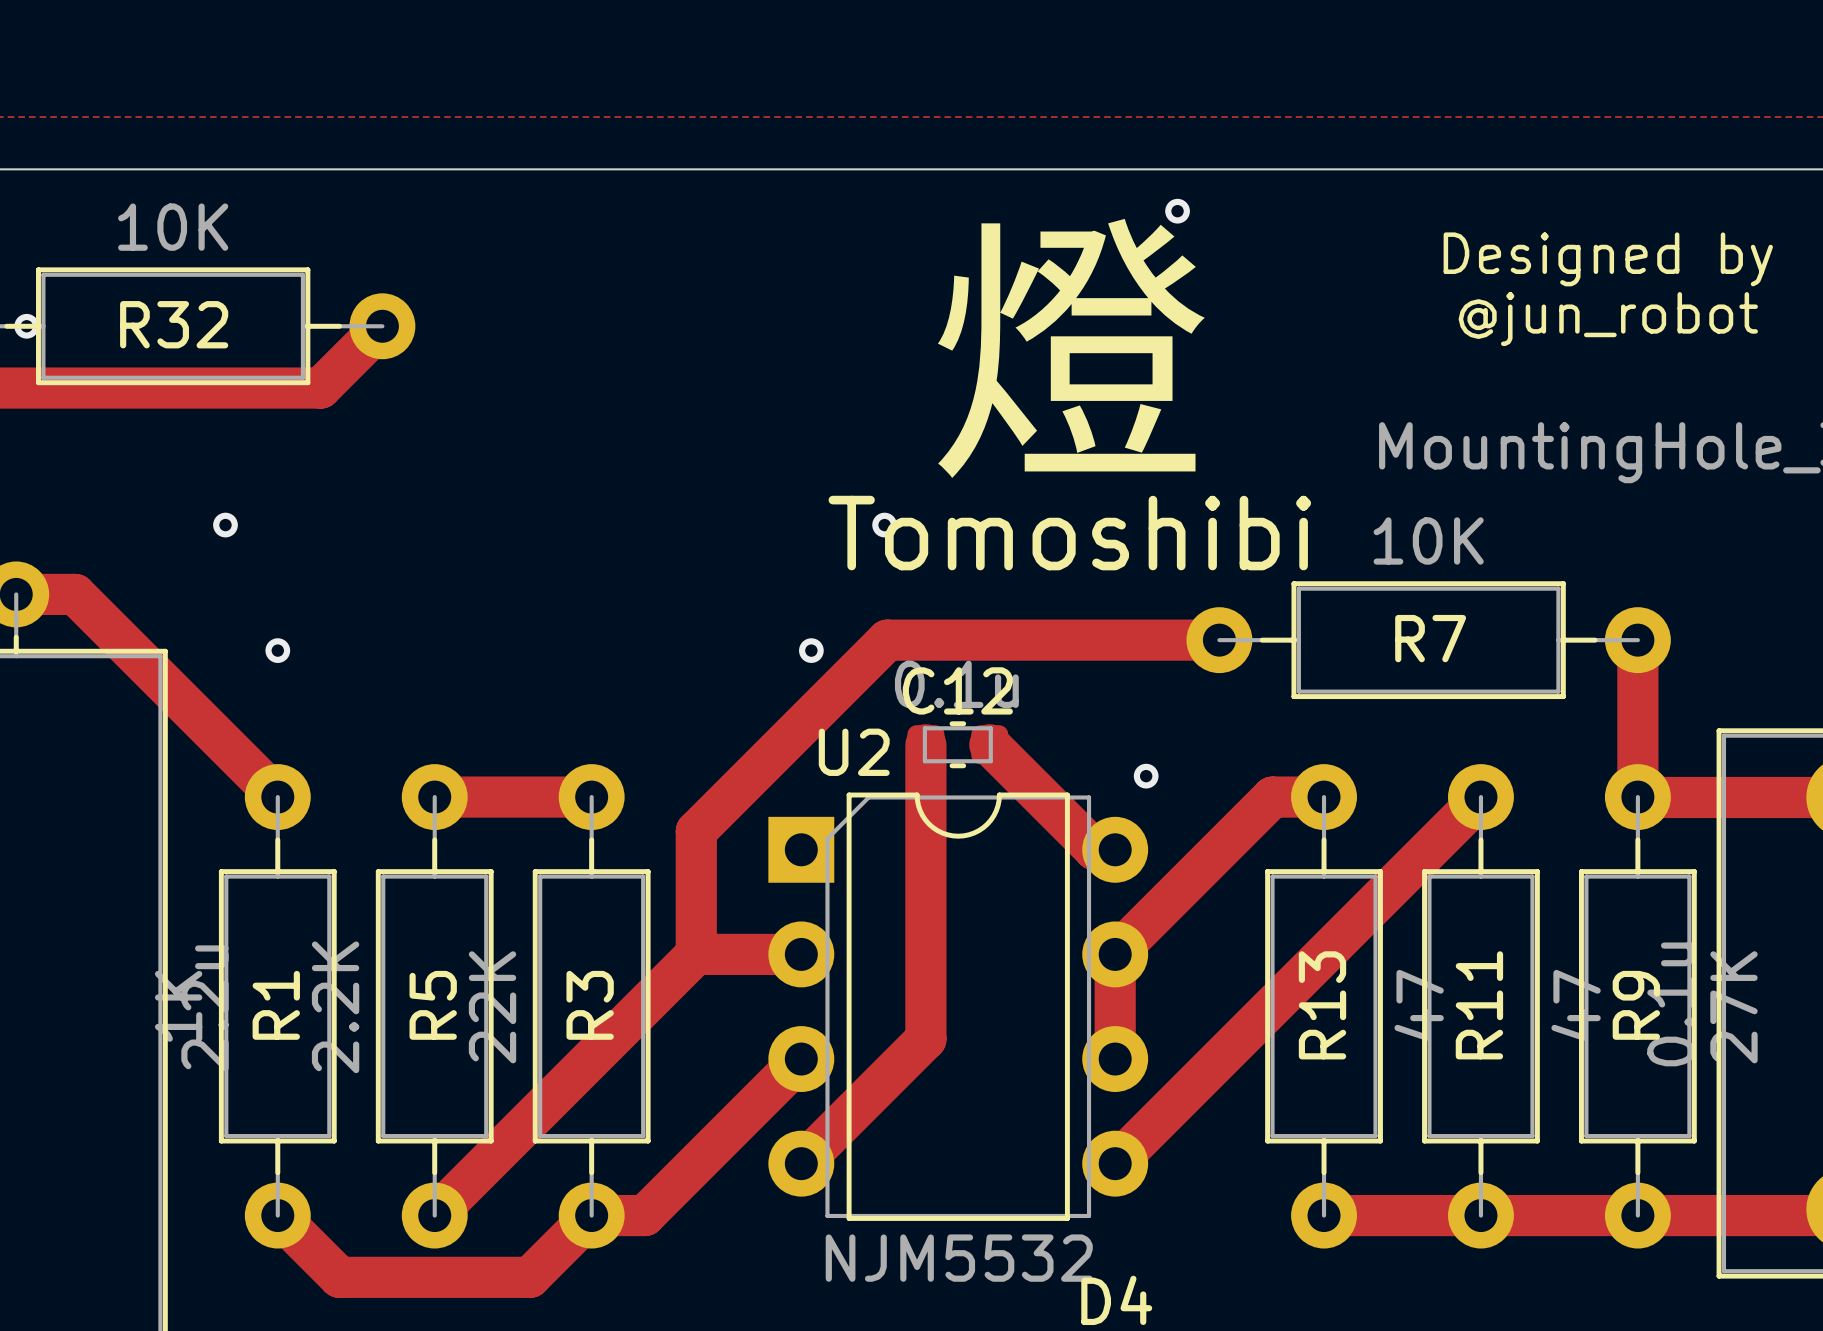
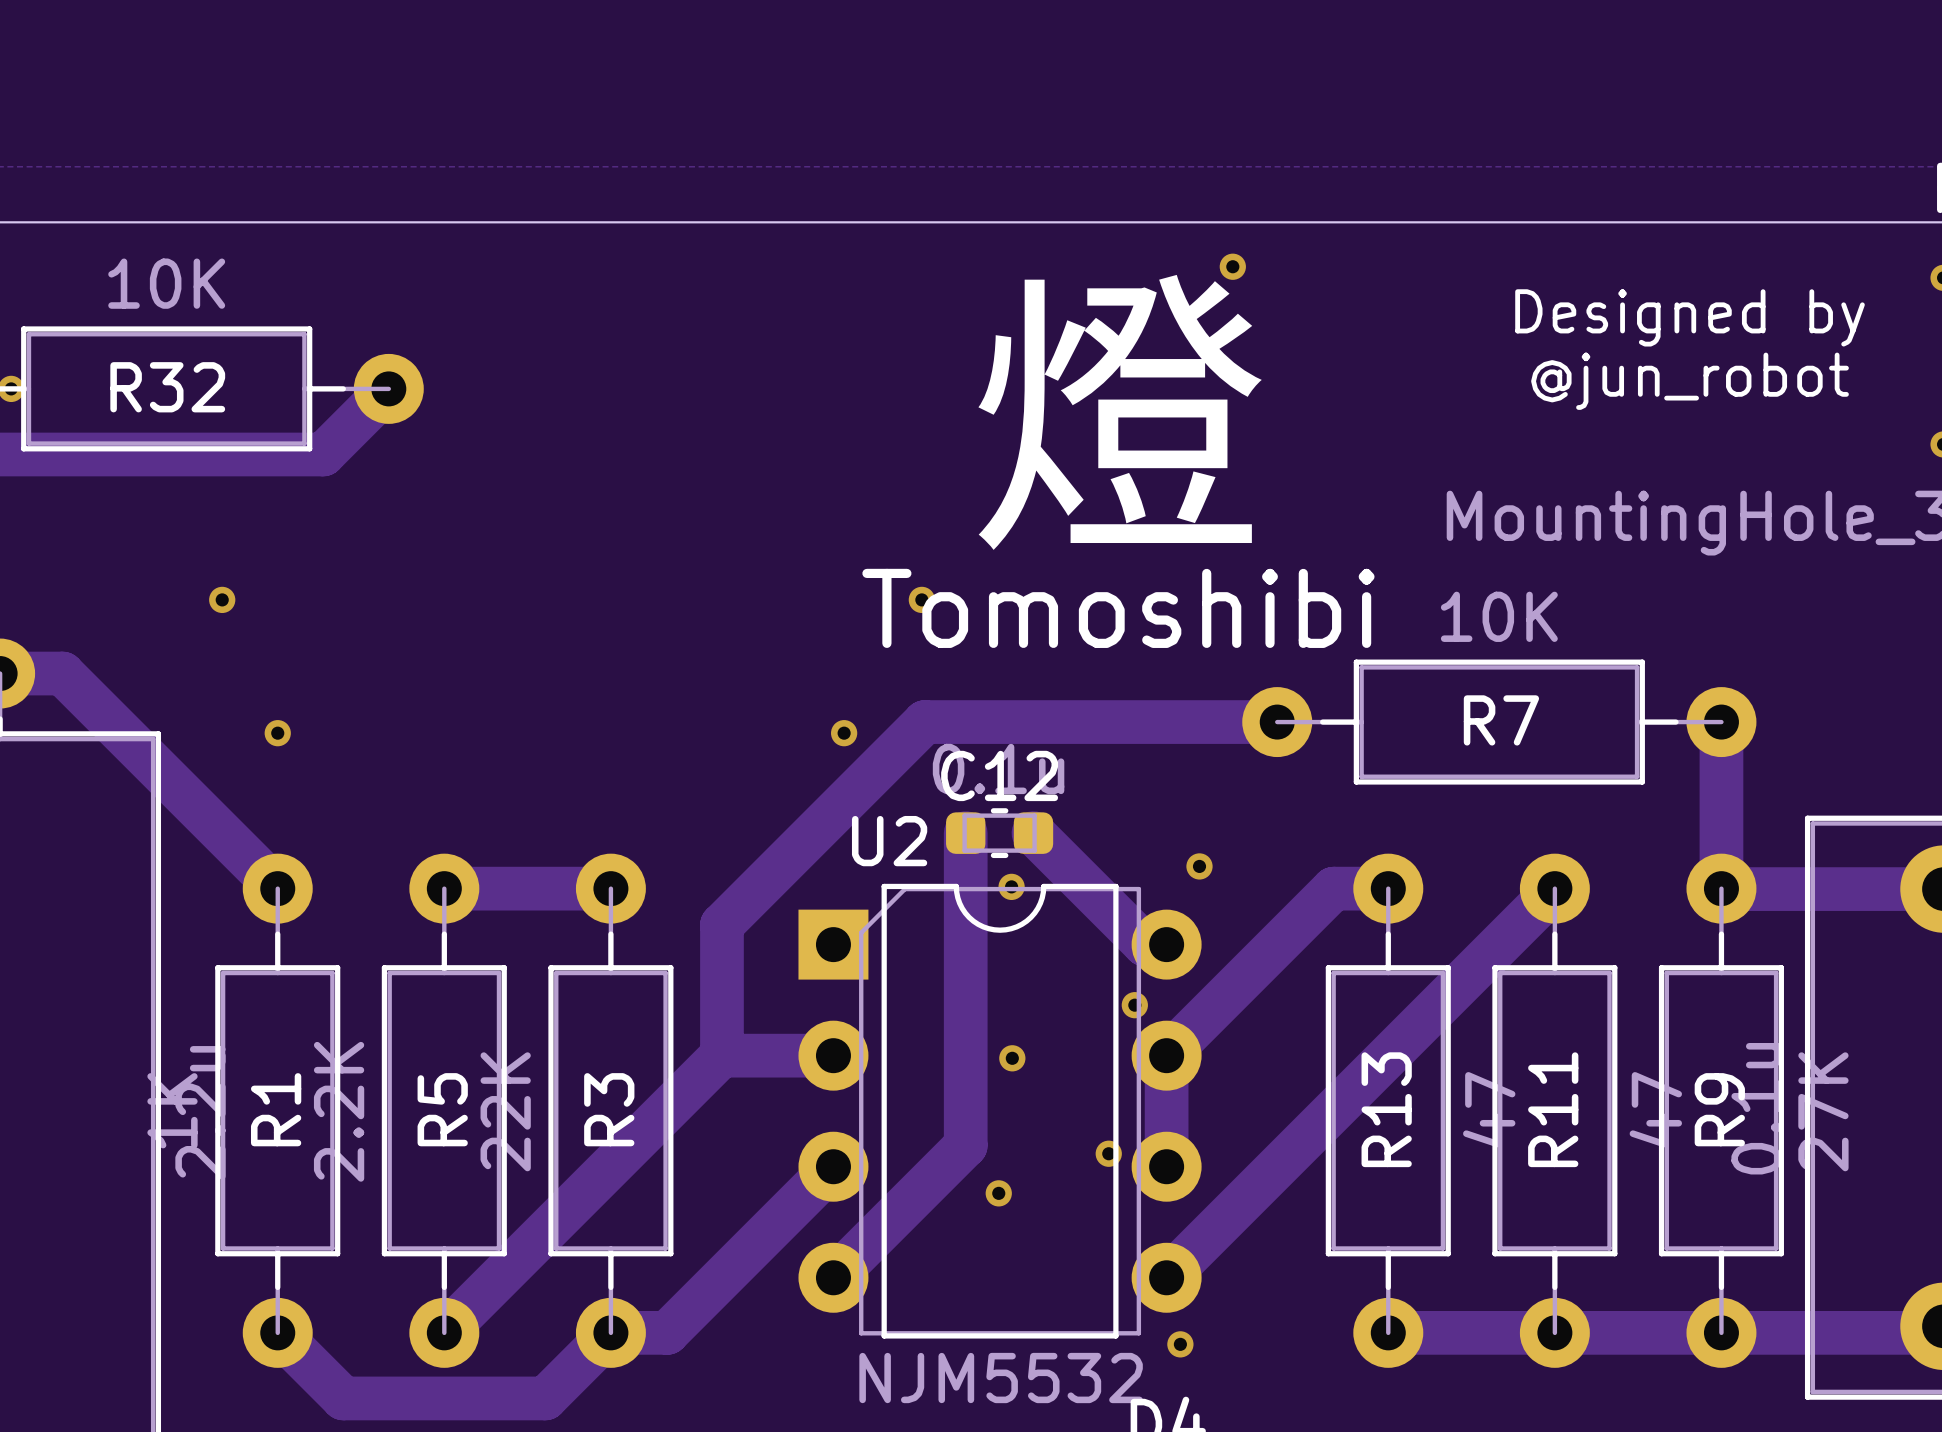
via: none -> (1011, 886)
via: none -> (1134, 1005)
via: none -> (1012, 1058)
via: none -> (1108, 1153)
via: none -> (998, 1193)
via: none -> (1180, 1344)

